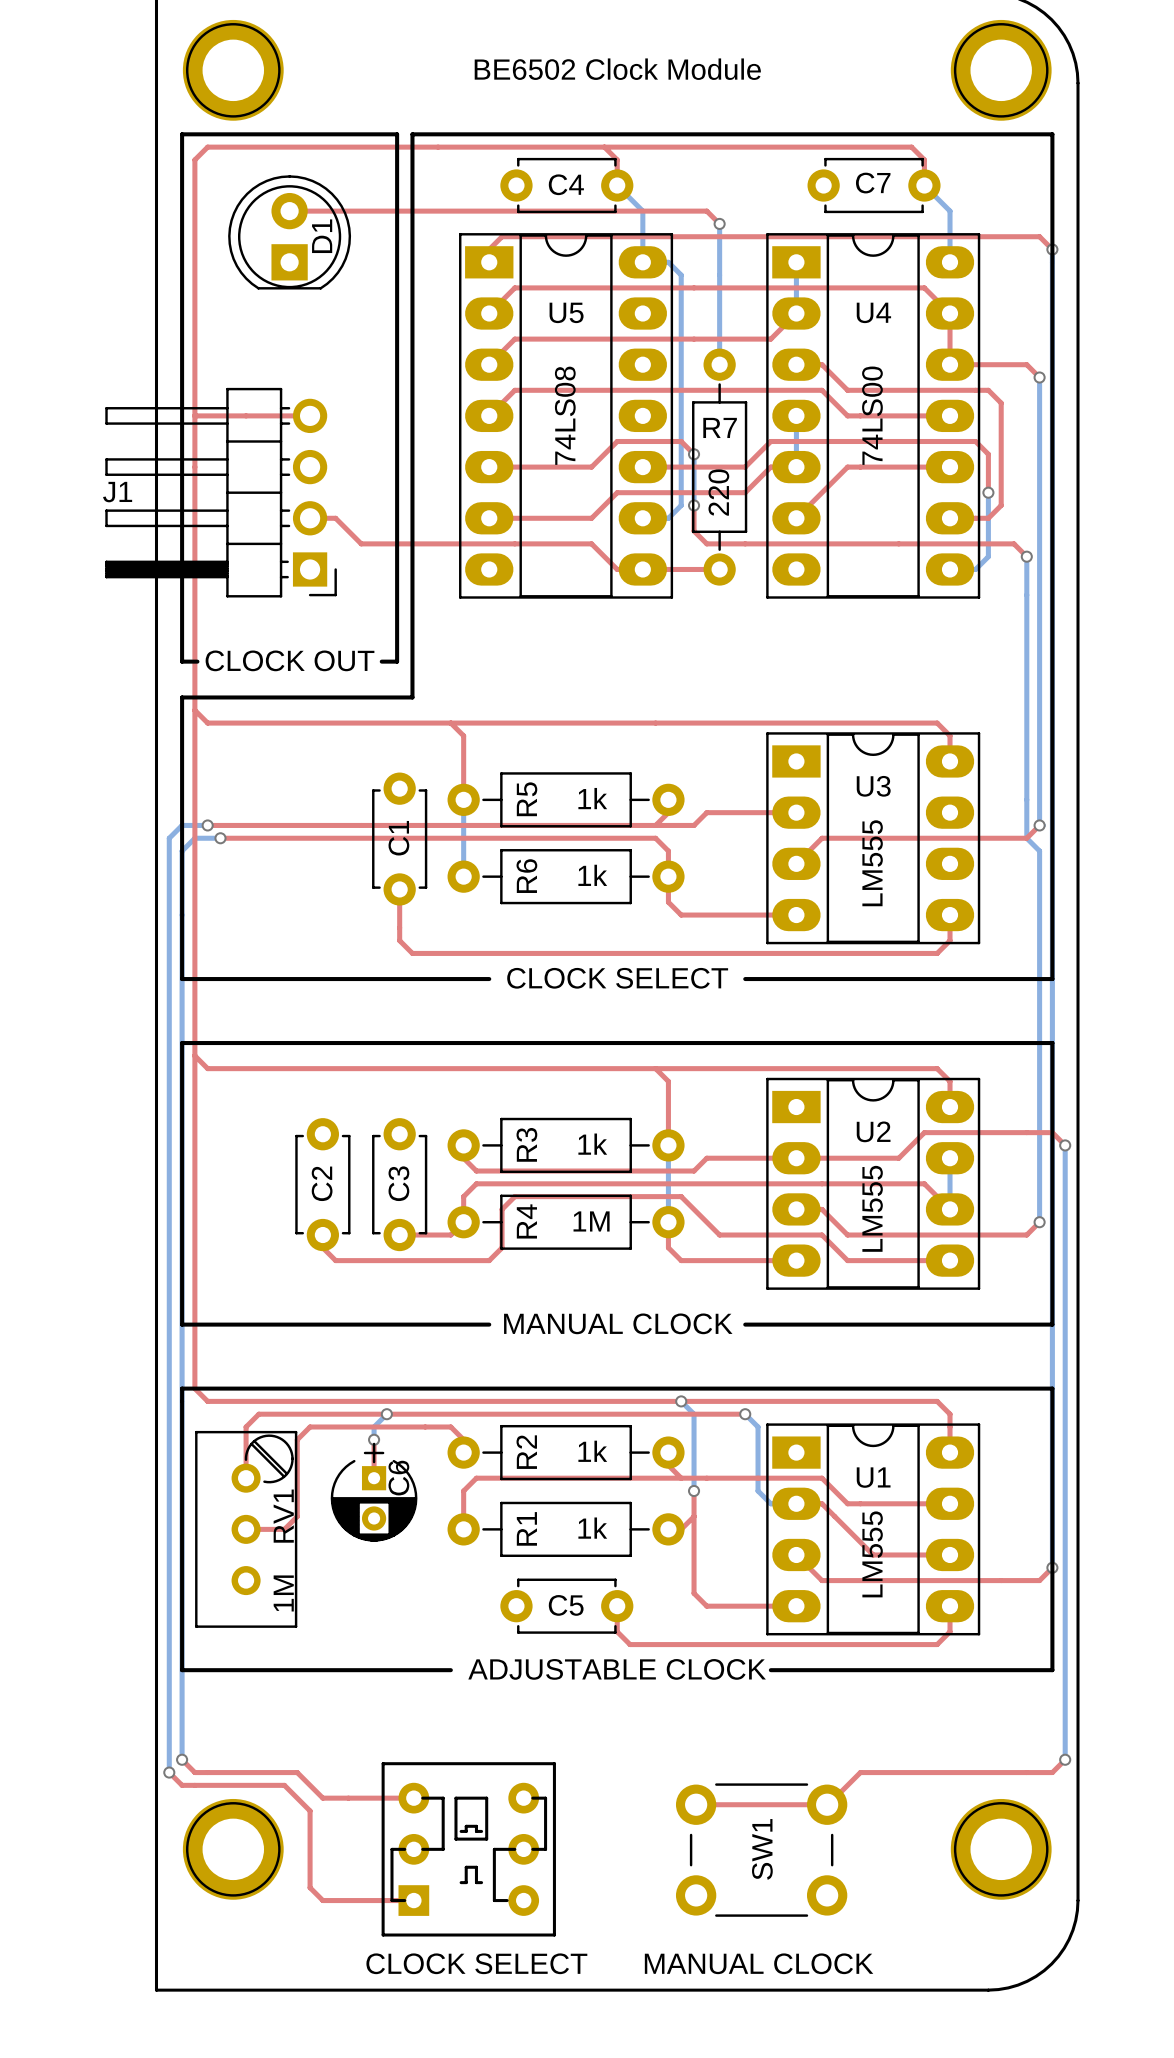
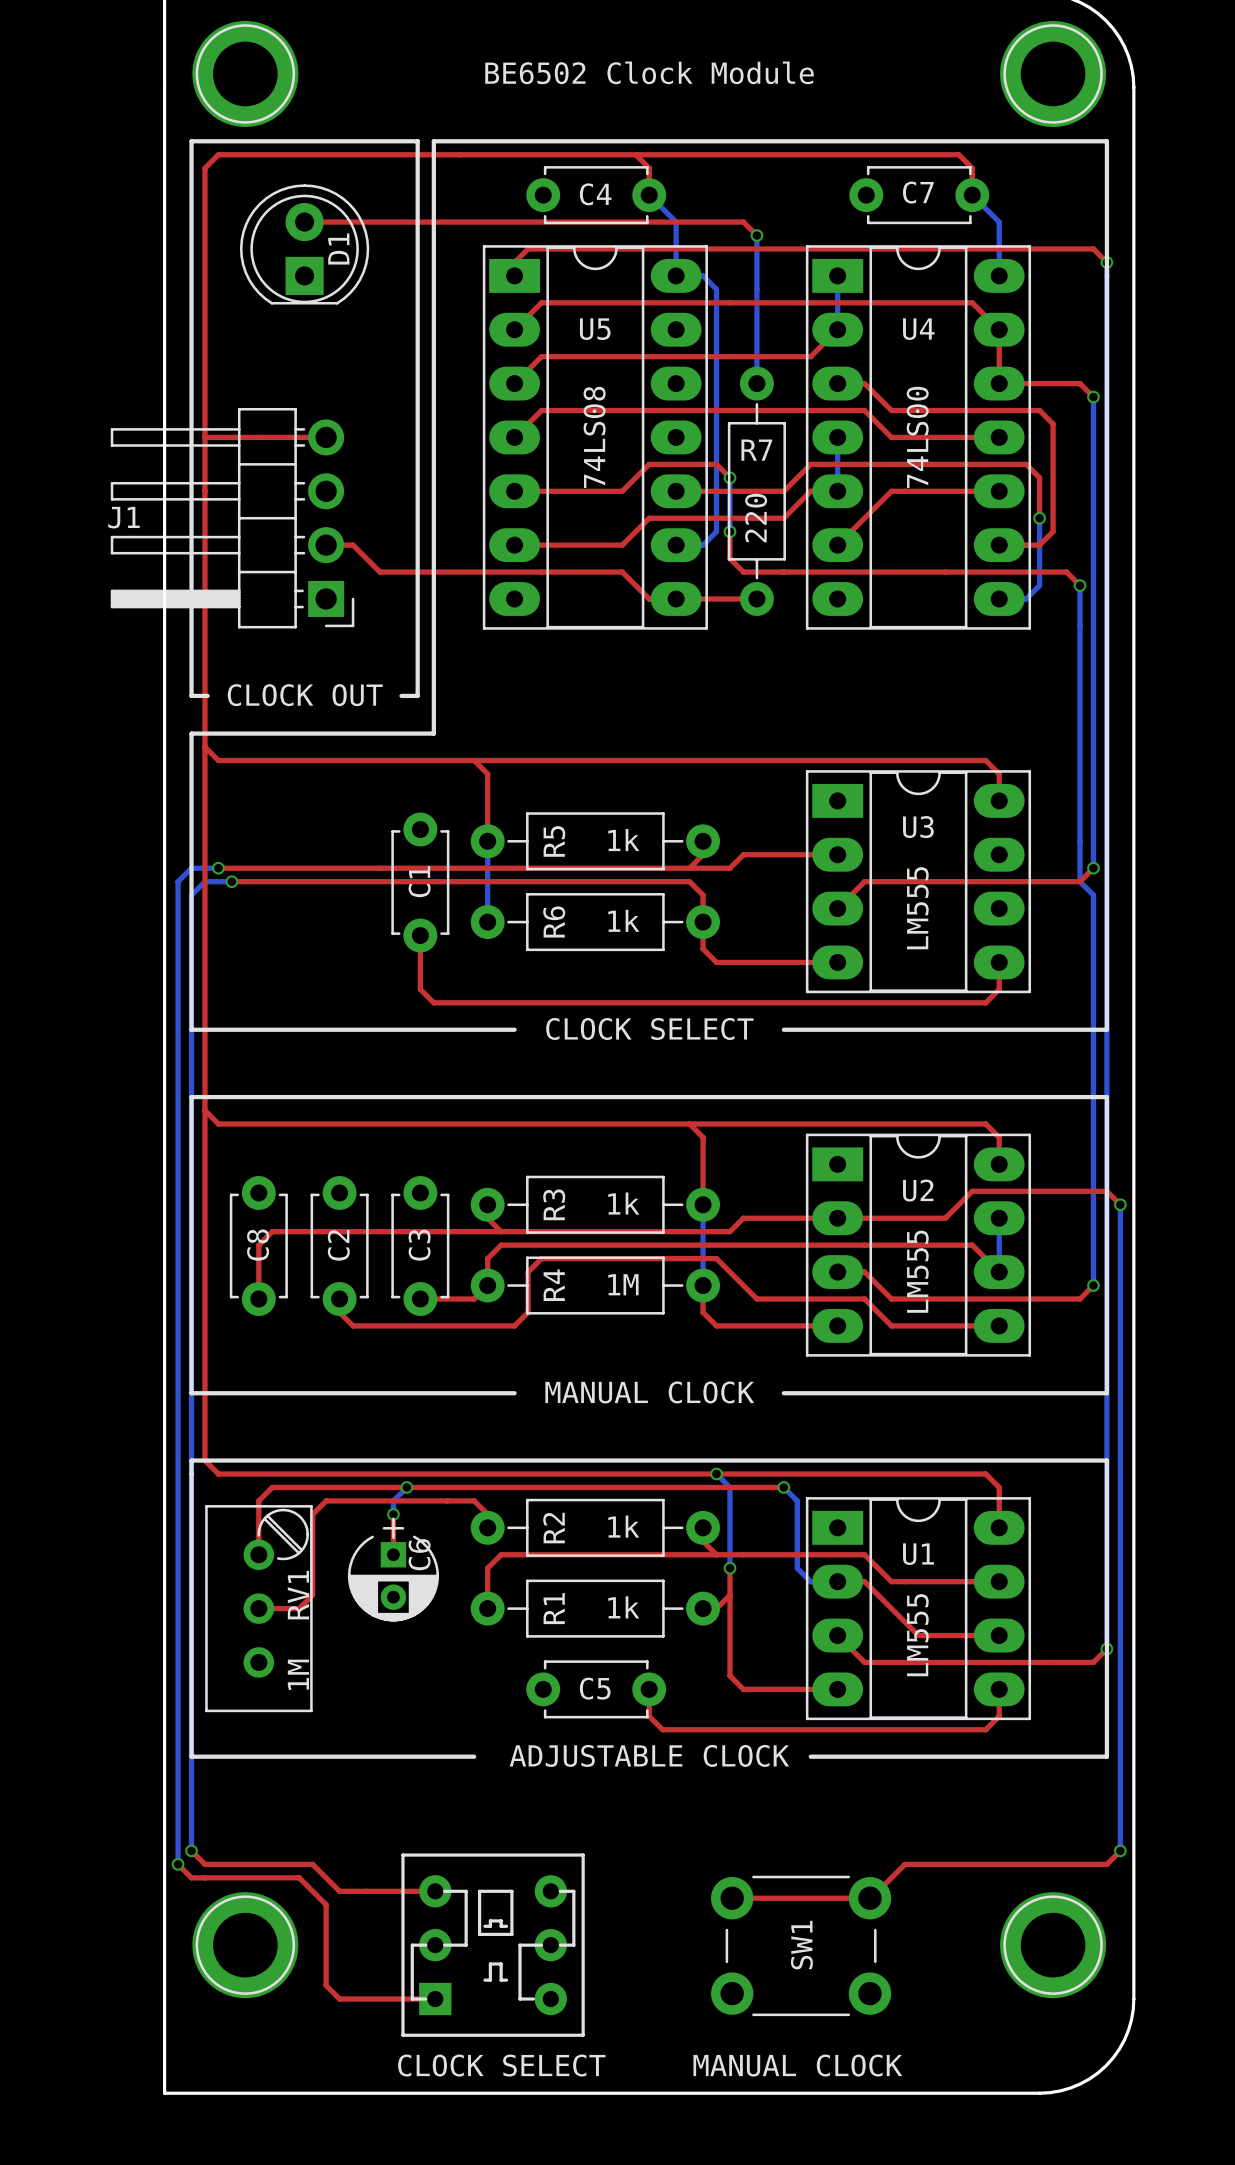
top track: none -> (501, 1231) (272, 1231) (258, 1245) (258, 1298)
C8: none -> (258, 1245)

